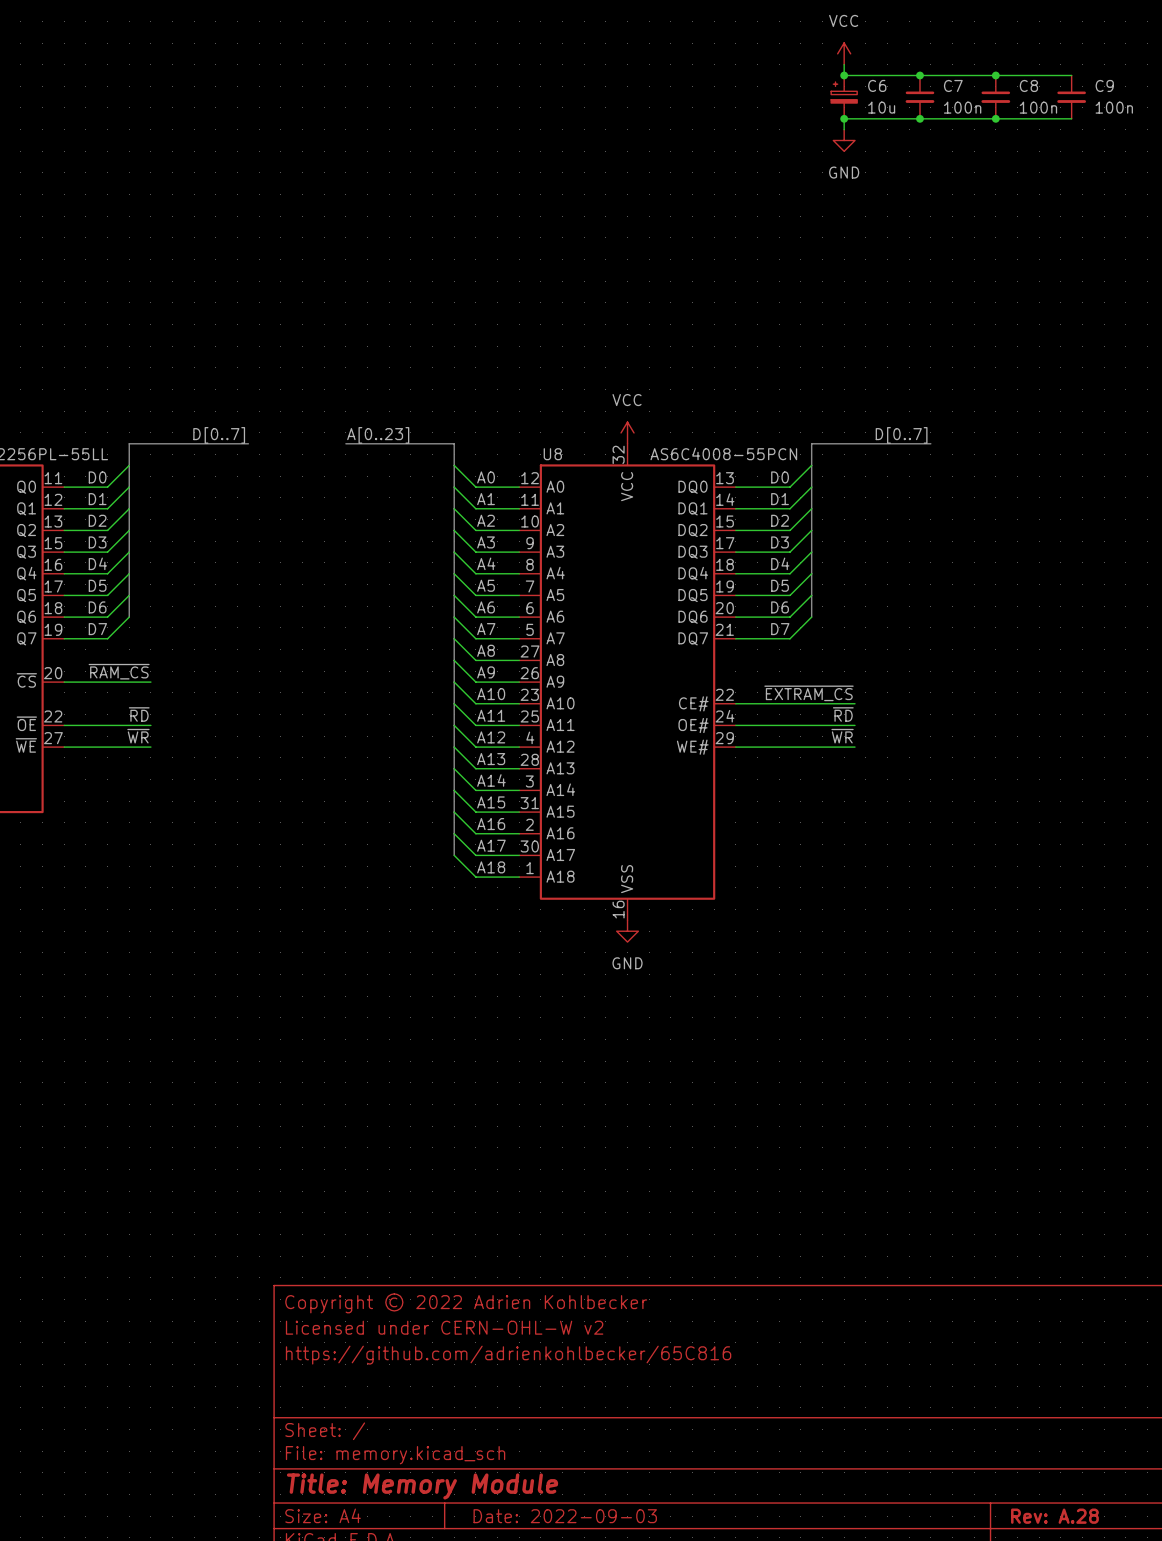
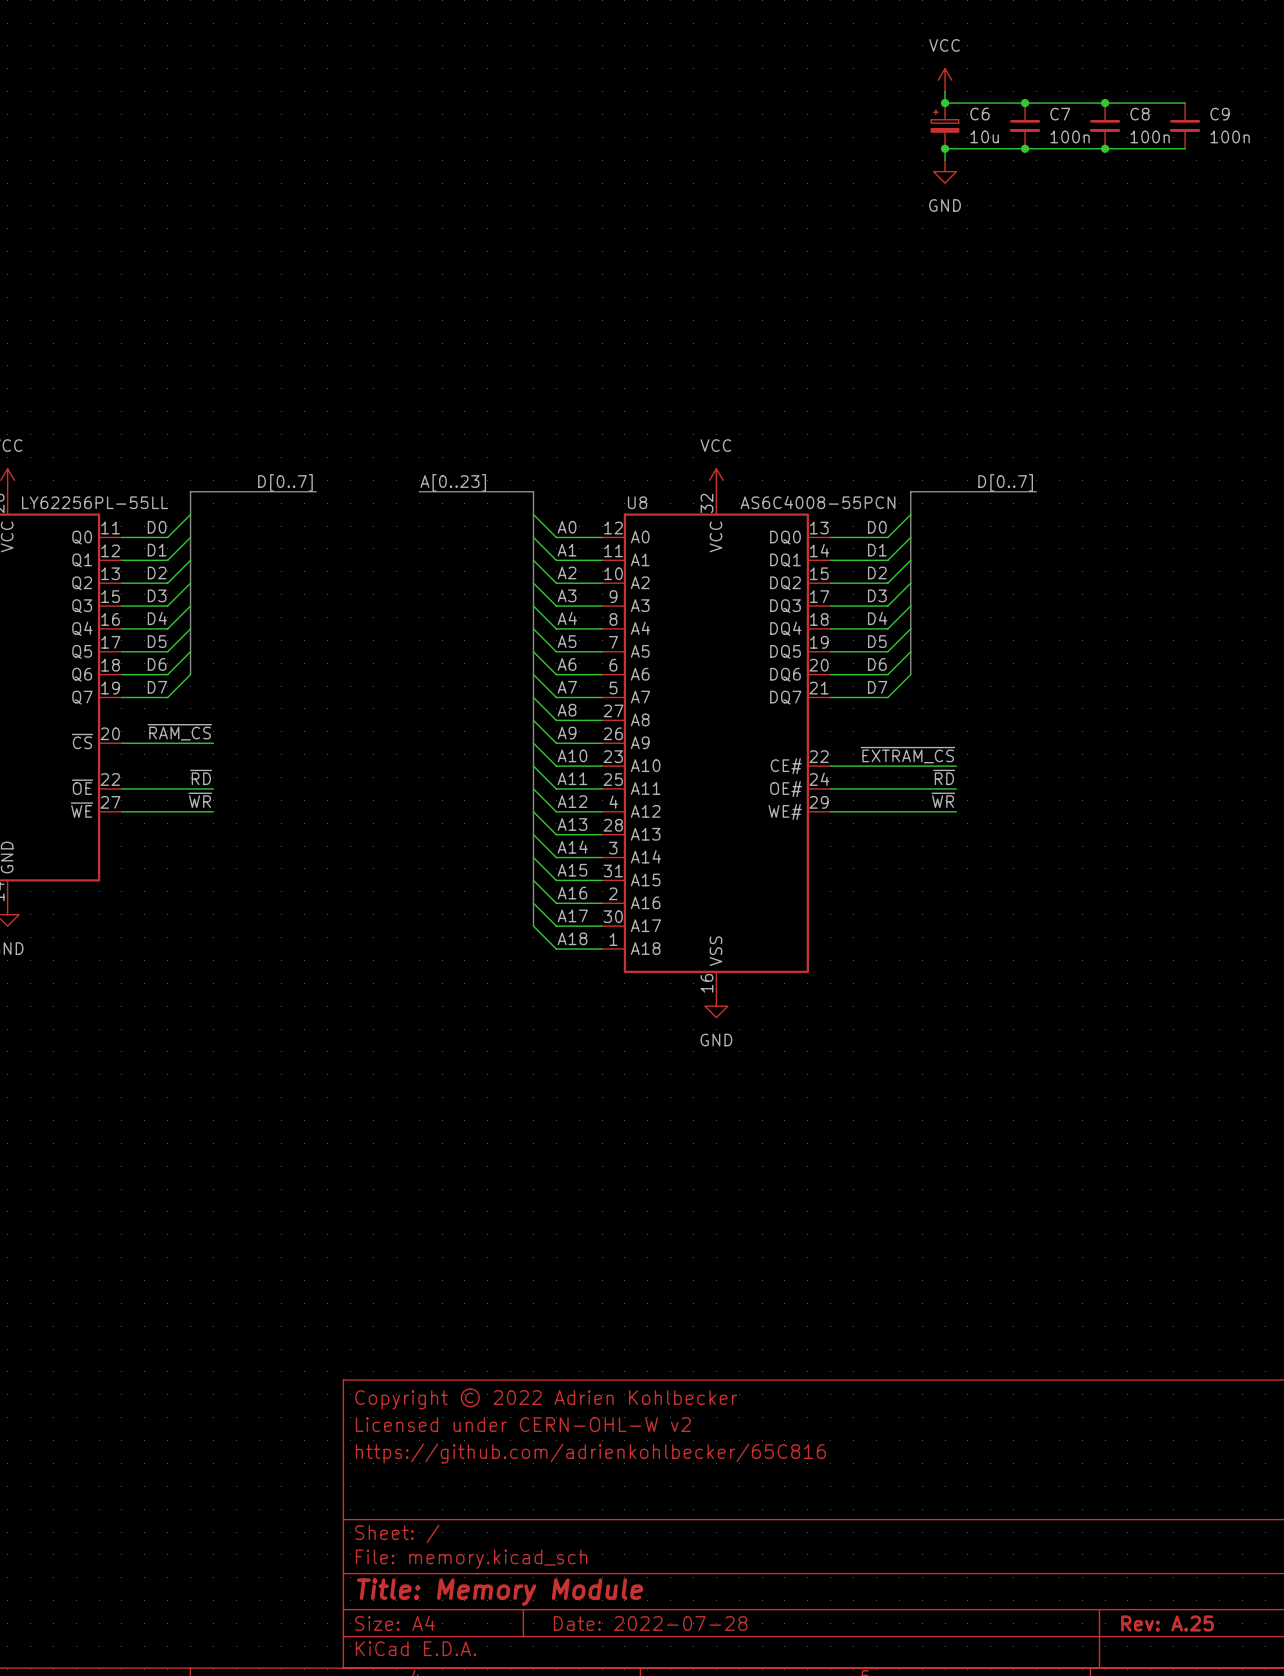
title block: Date: 2022-09-03 (565, 1516) -> Date: 2022-07-28 (650, 1623)
title block: Rev: A.28 (1054, 1516) -> Rev: A.25 (1167, 1623)

